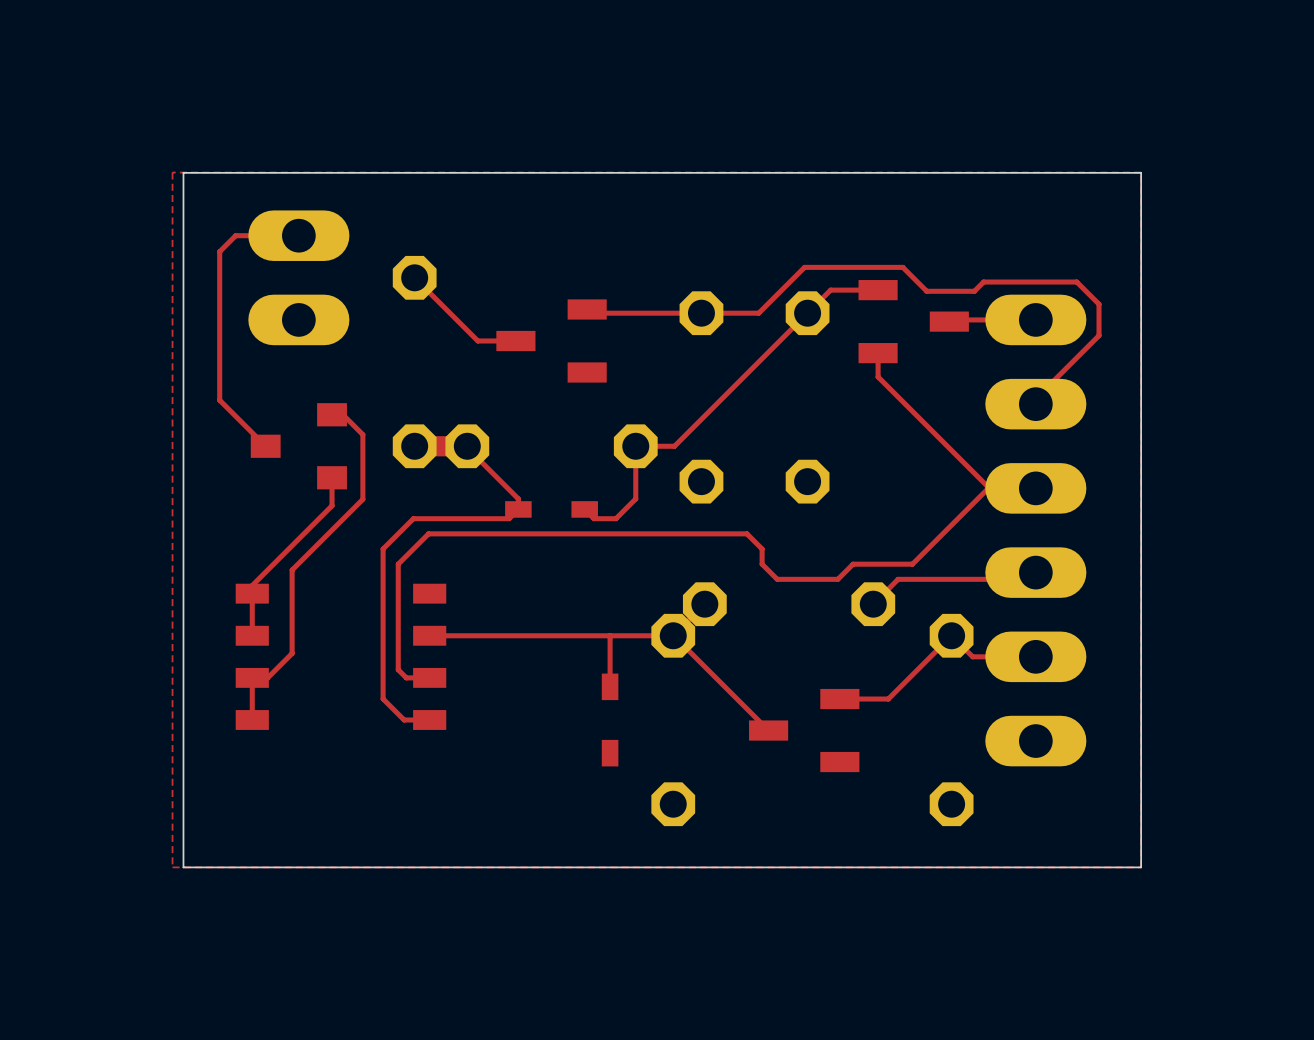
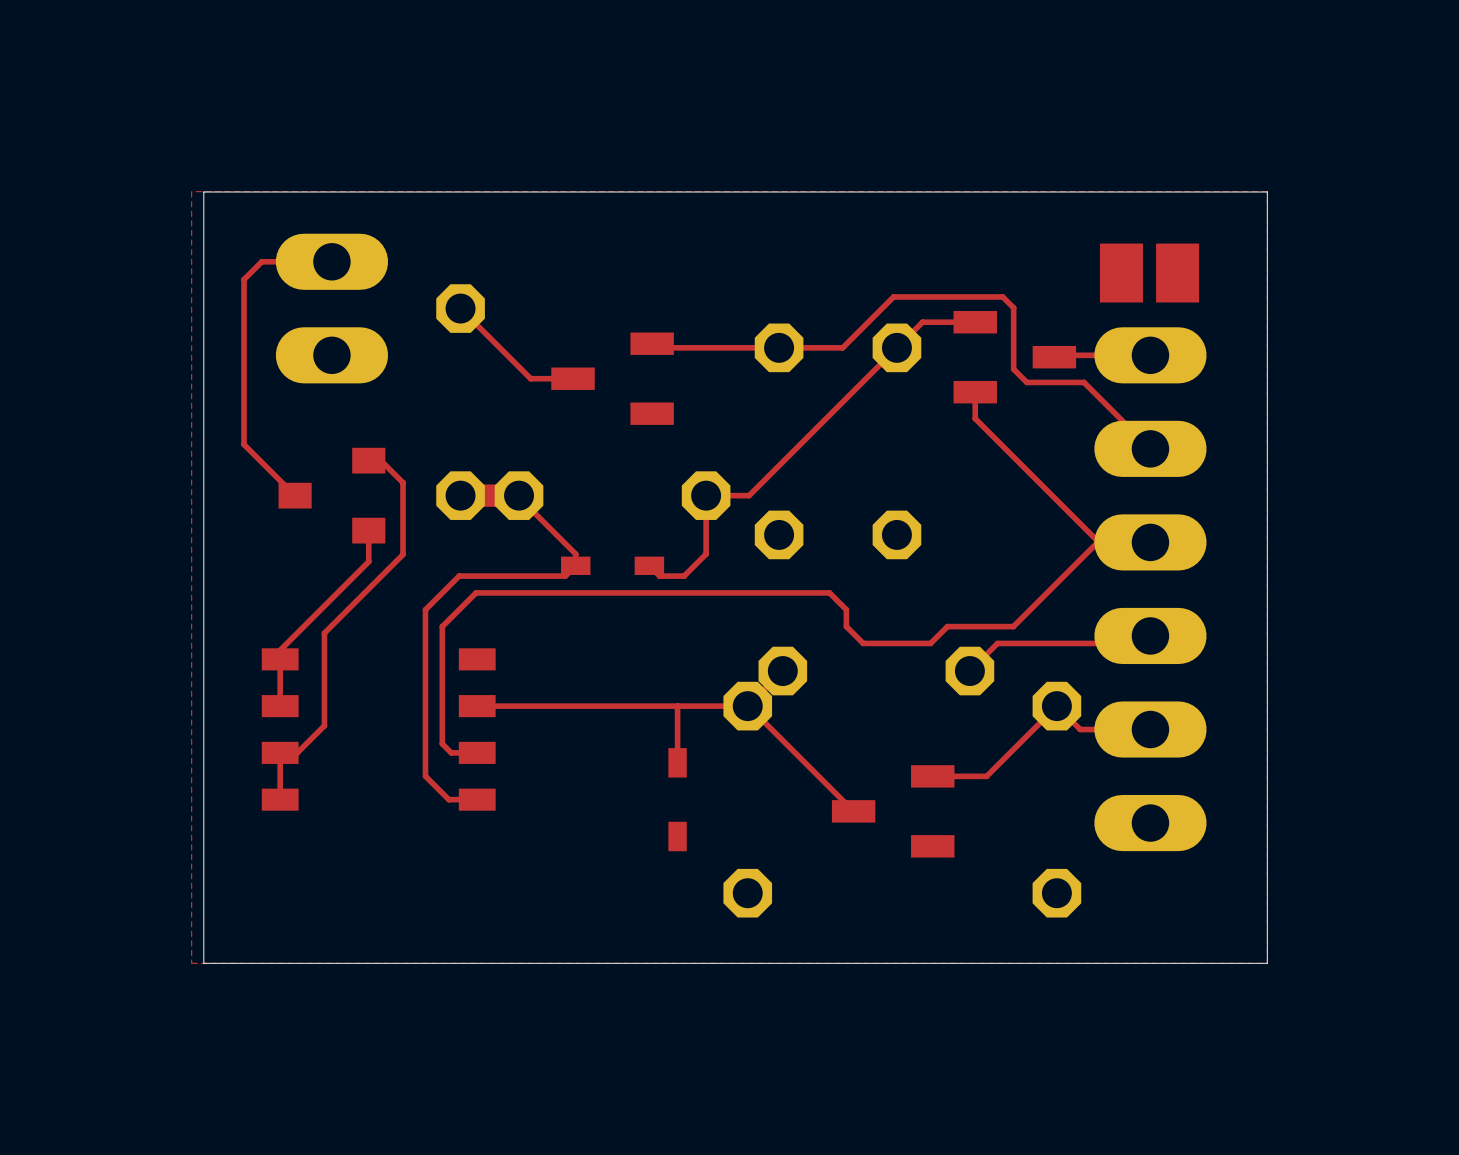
part: none -> (1149, 273)
top track: (912, 277) (926, 291) (974, 291) (983, 282) (1076, 282) (1099, 304) (1099, 335) (1035, 398) -> (1013, 307) (1013, 369) (1026, 382) (1084, 382) (1150, 448)

